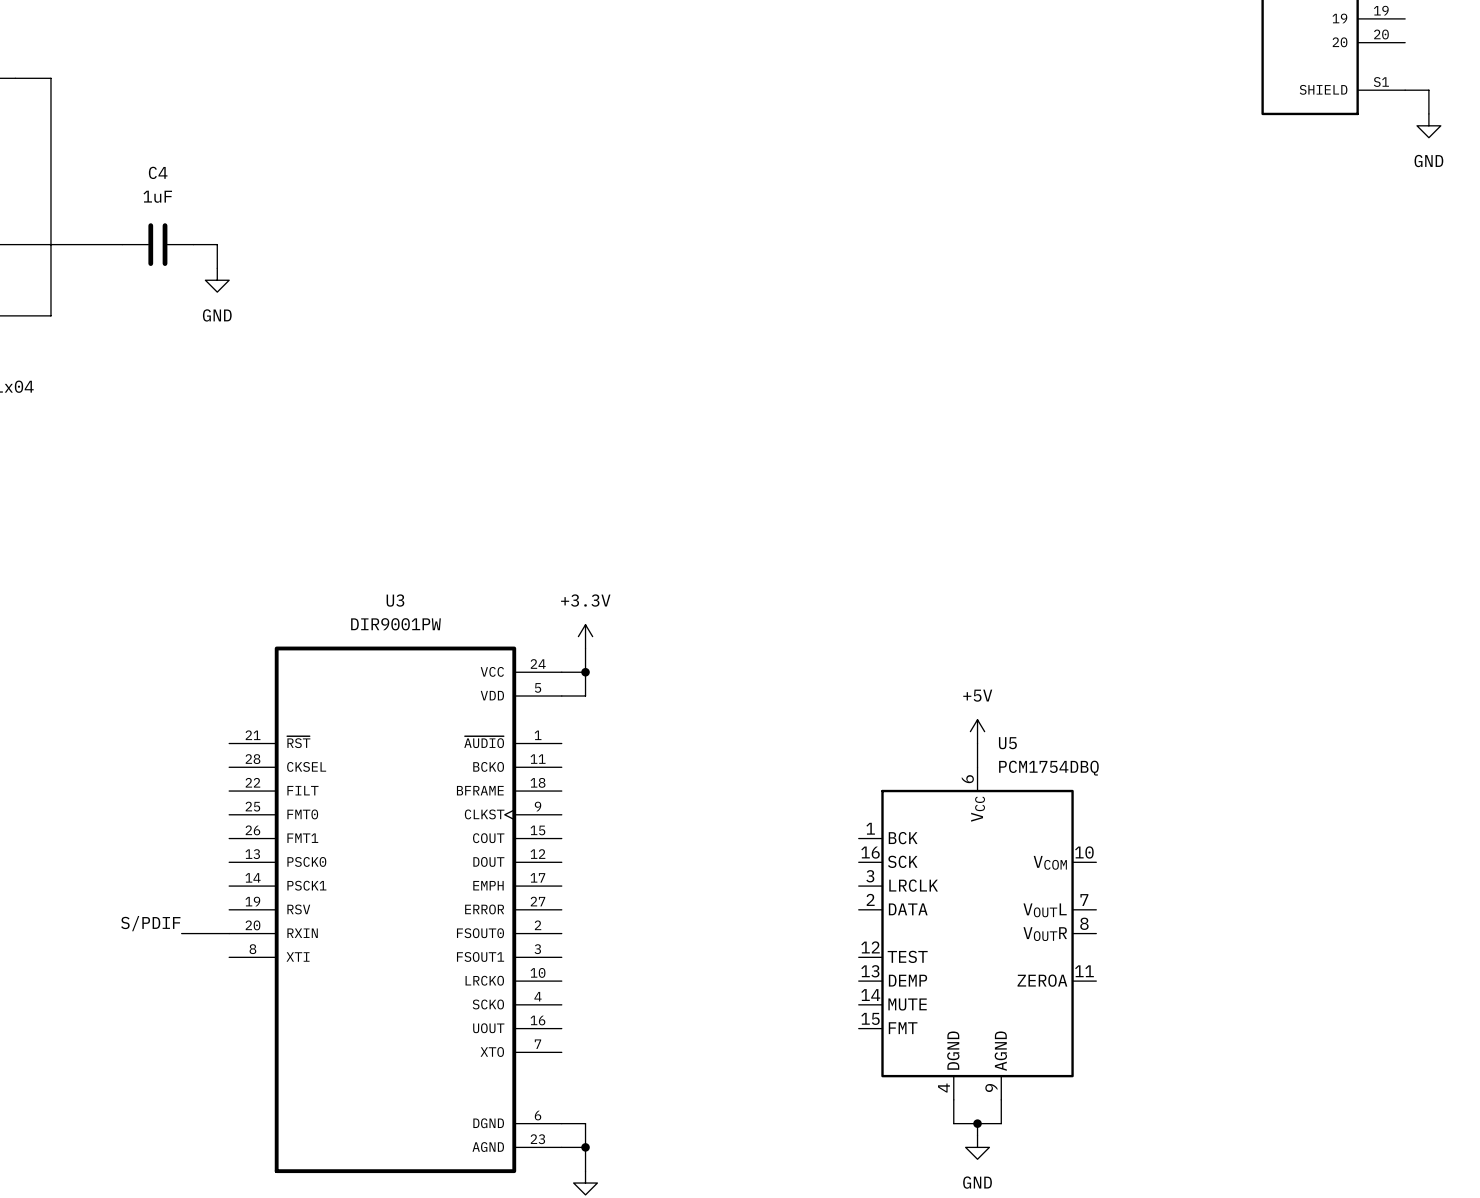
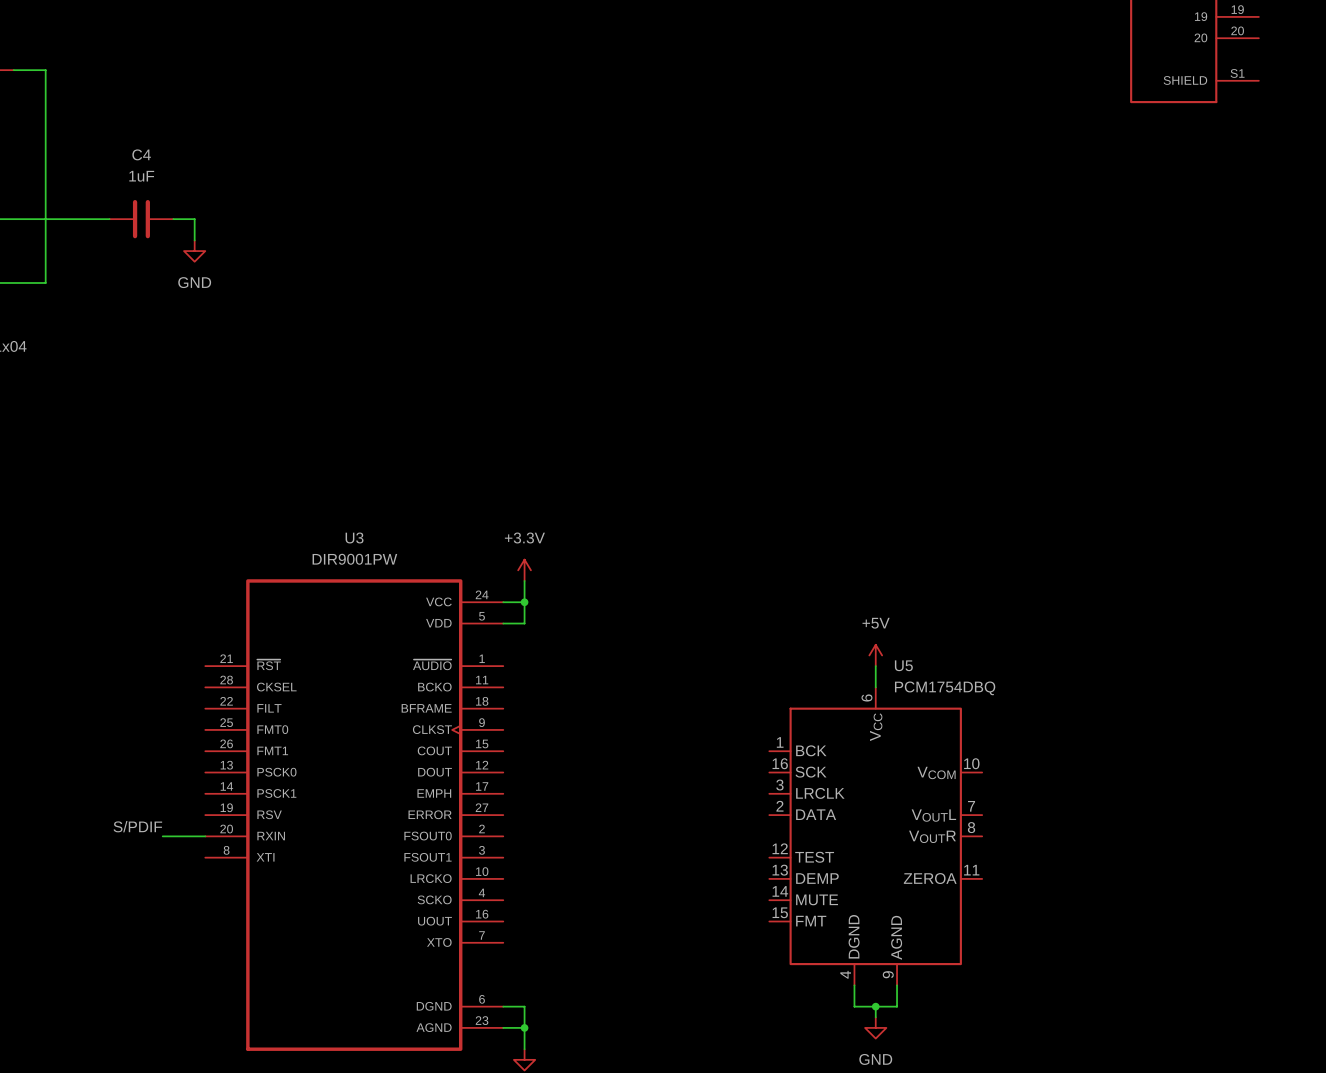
wire: (1405, 90) (1428, 90) (1428, 113) -> none
power symbol: GND (1428, 125) -> none

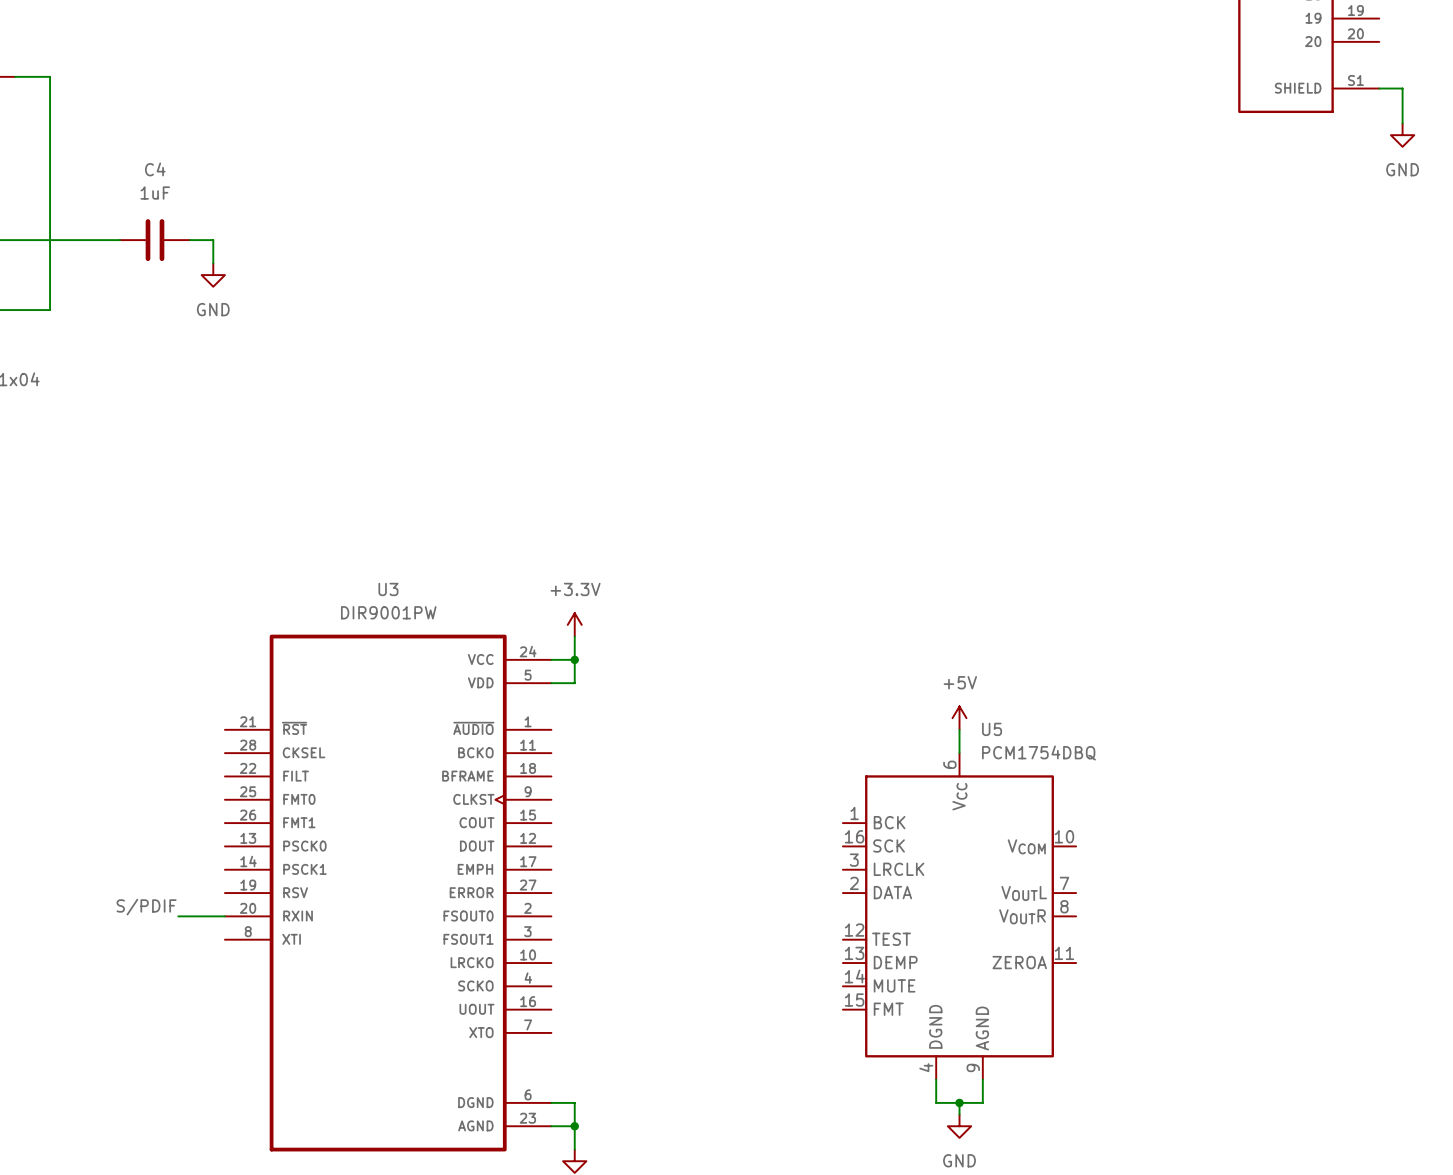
wire: none -> (1379, 88) (1402, 88) (1402, 123)
power symbol: none -> GND (1402, 135)

